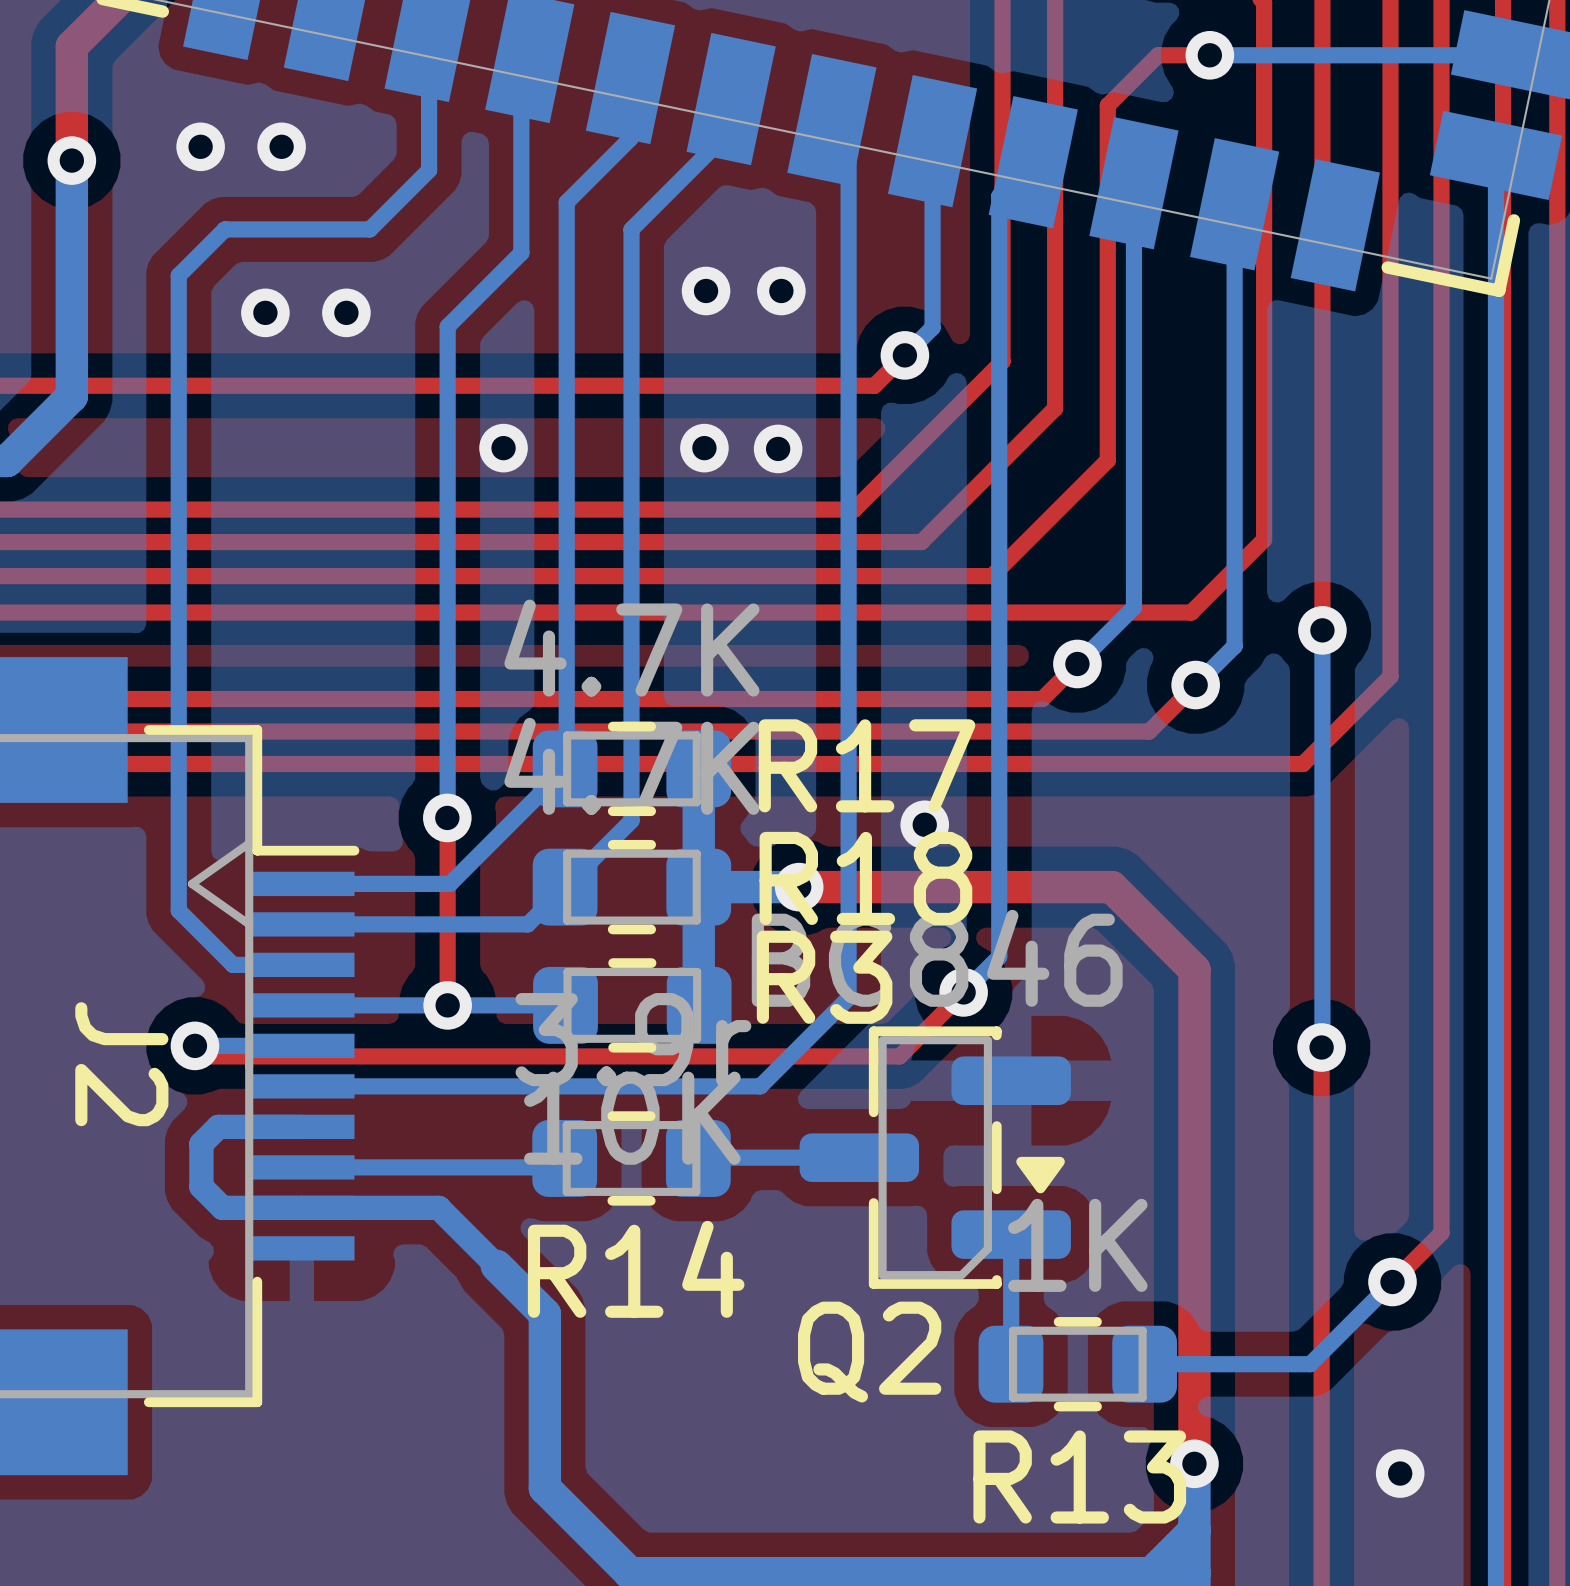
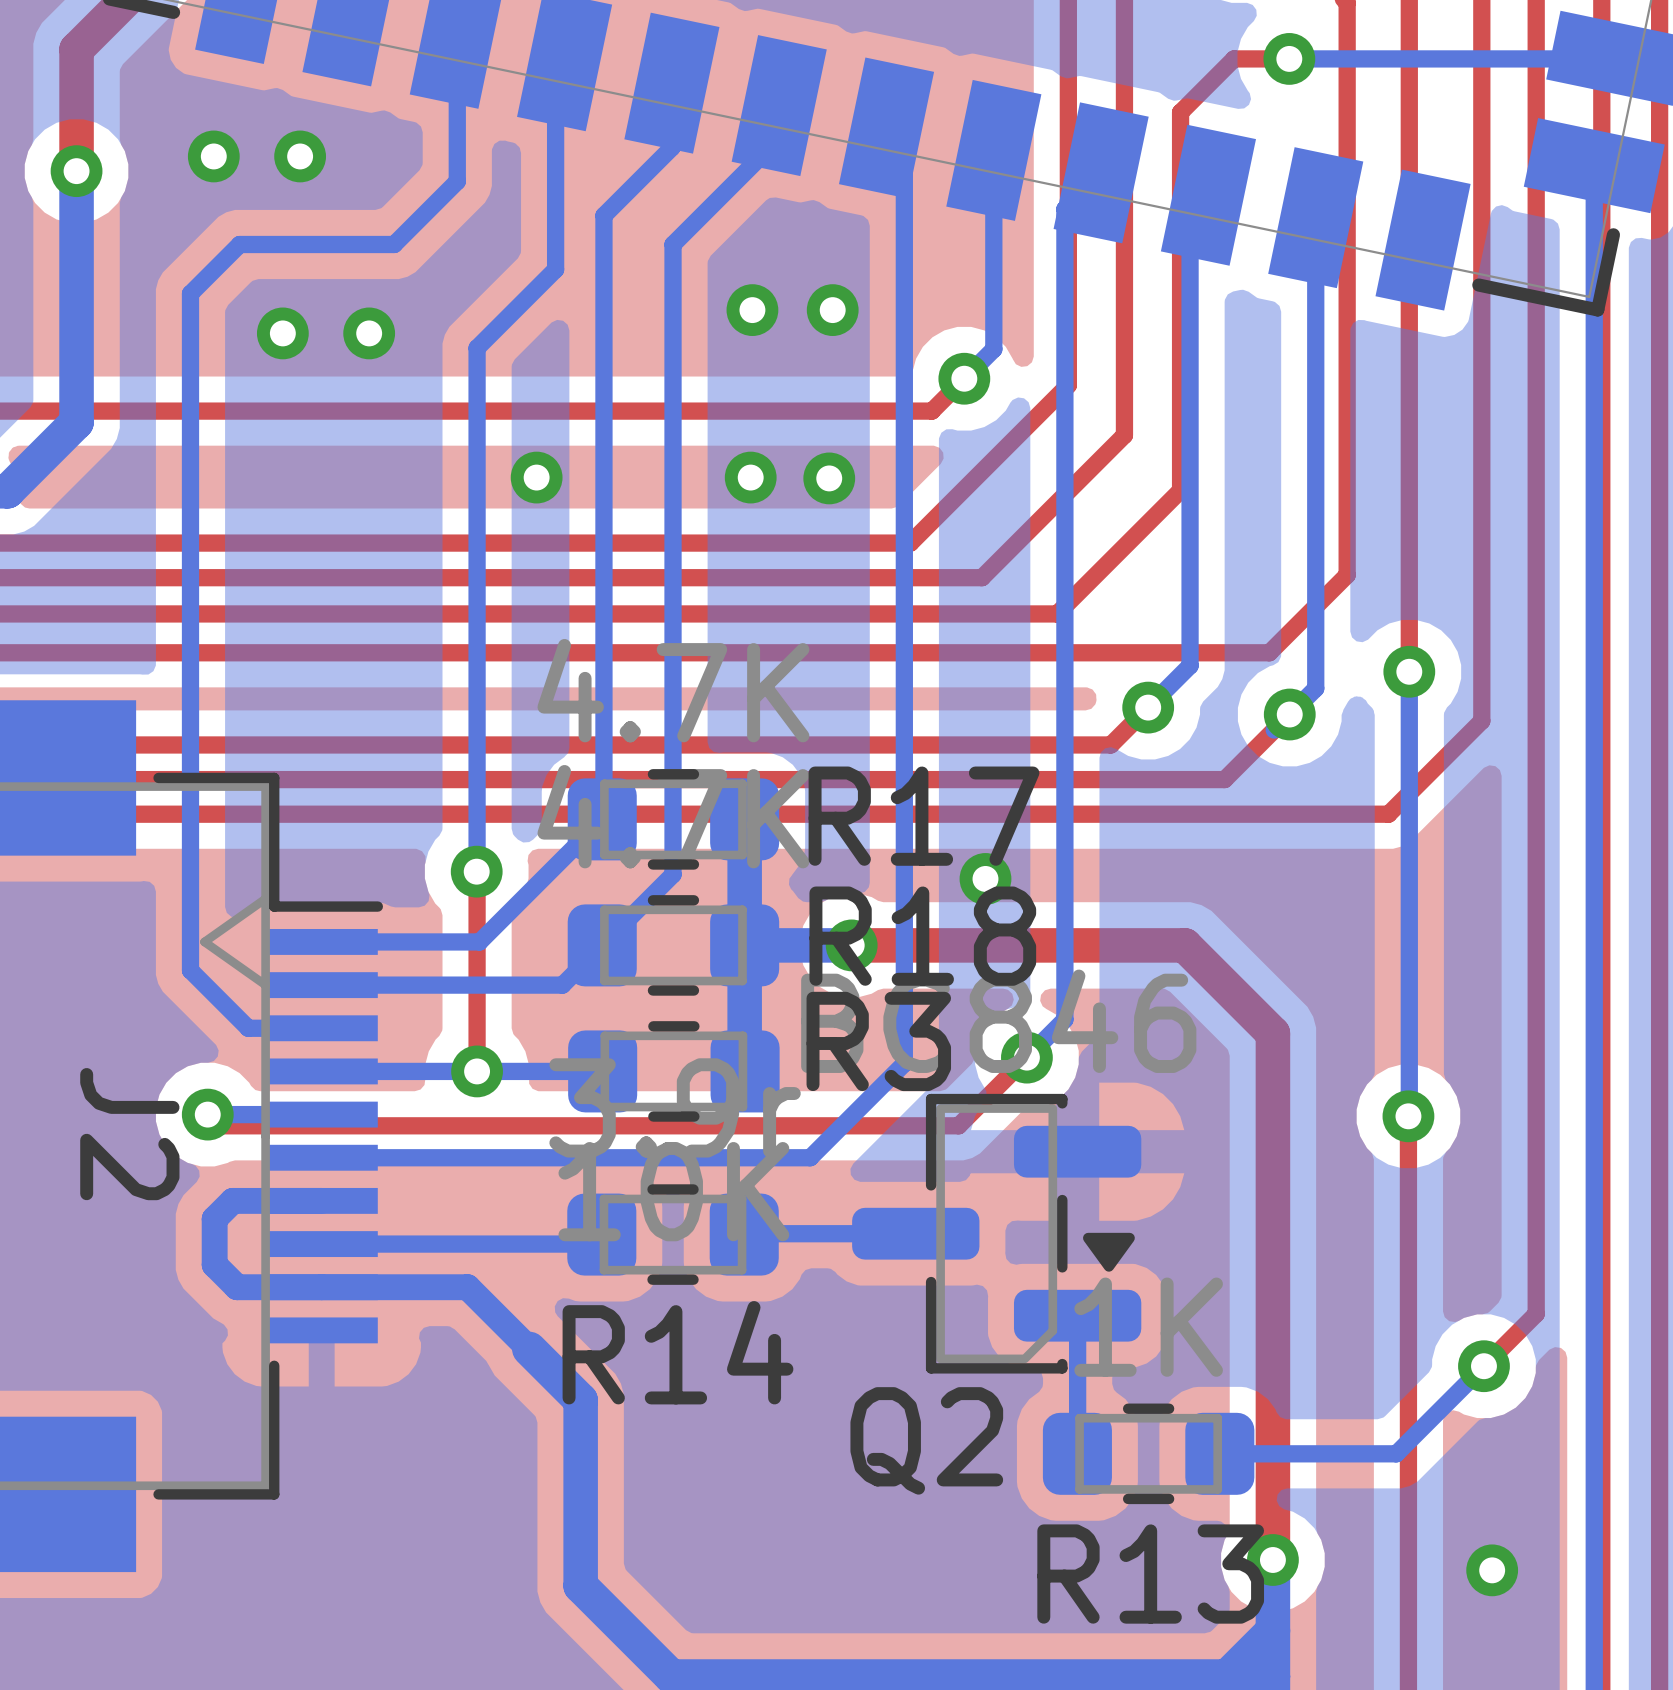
bottom track: (1133, 183) (1133, 607) (1116, 624) -> (1208, 195) (1190, 213) (1190, 665)
via position: (1195, 685) -> (1289, 714)

